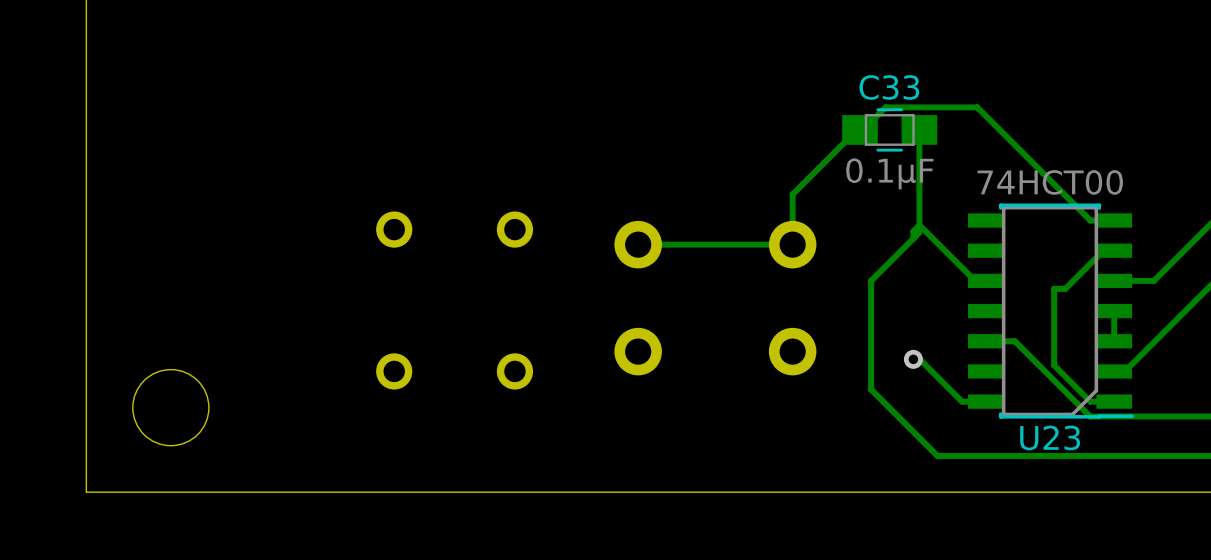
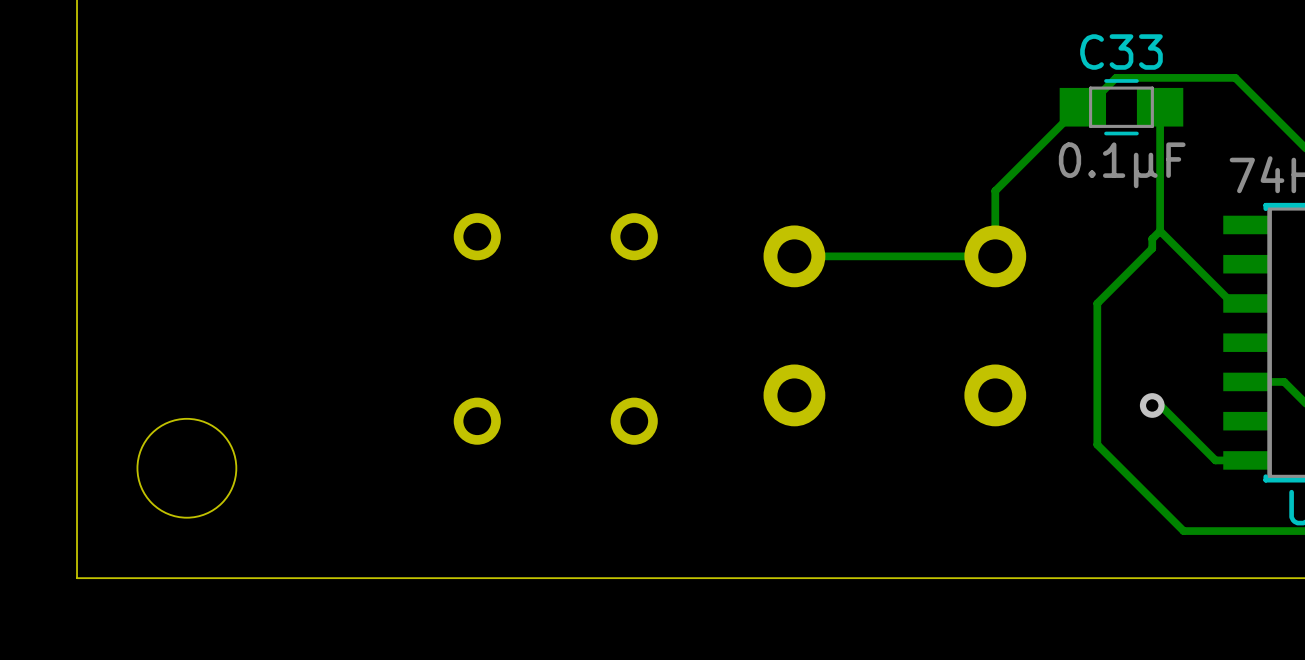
track: (919, 232) (913, 238) -> none

